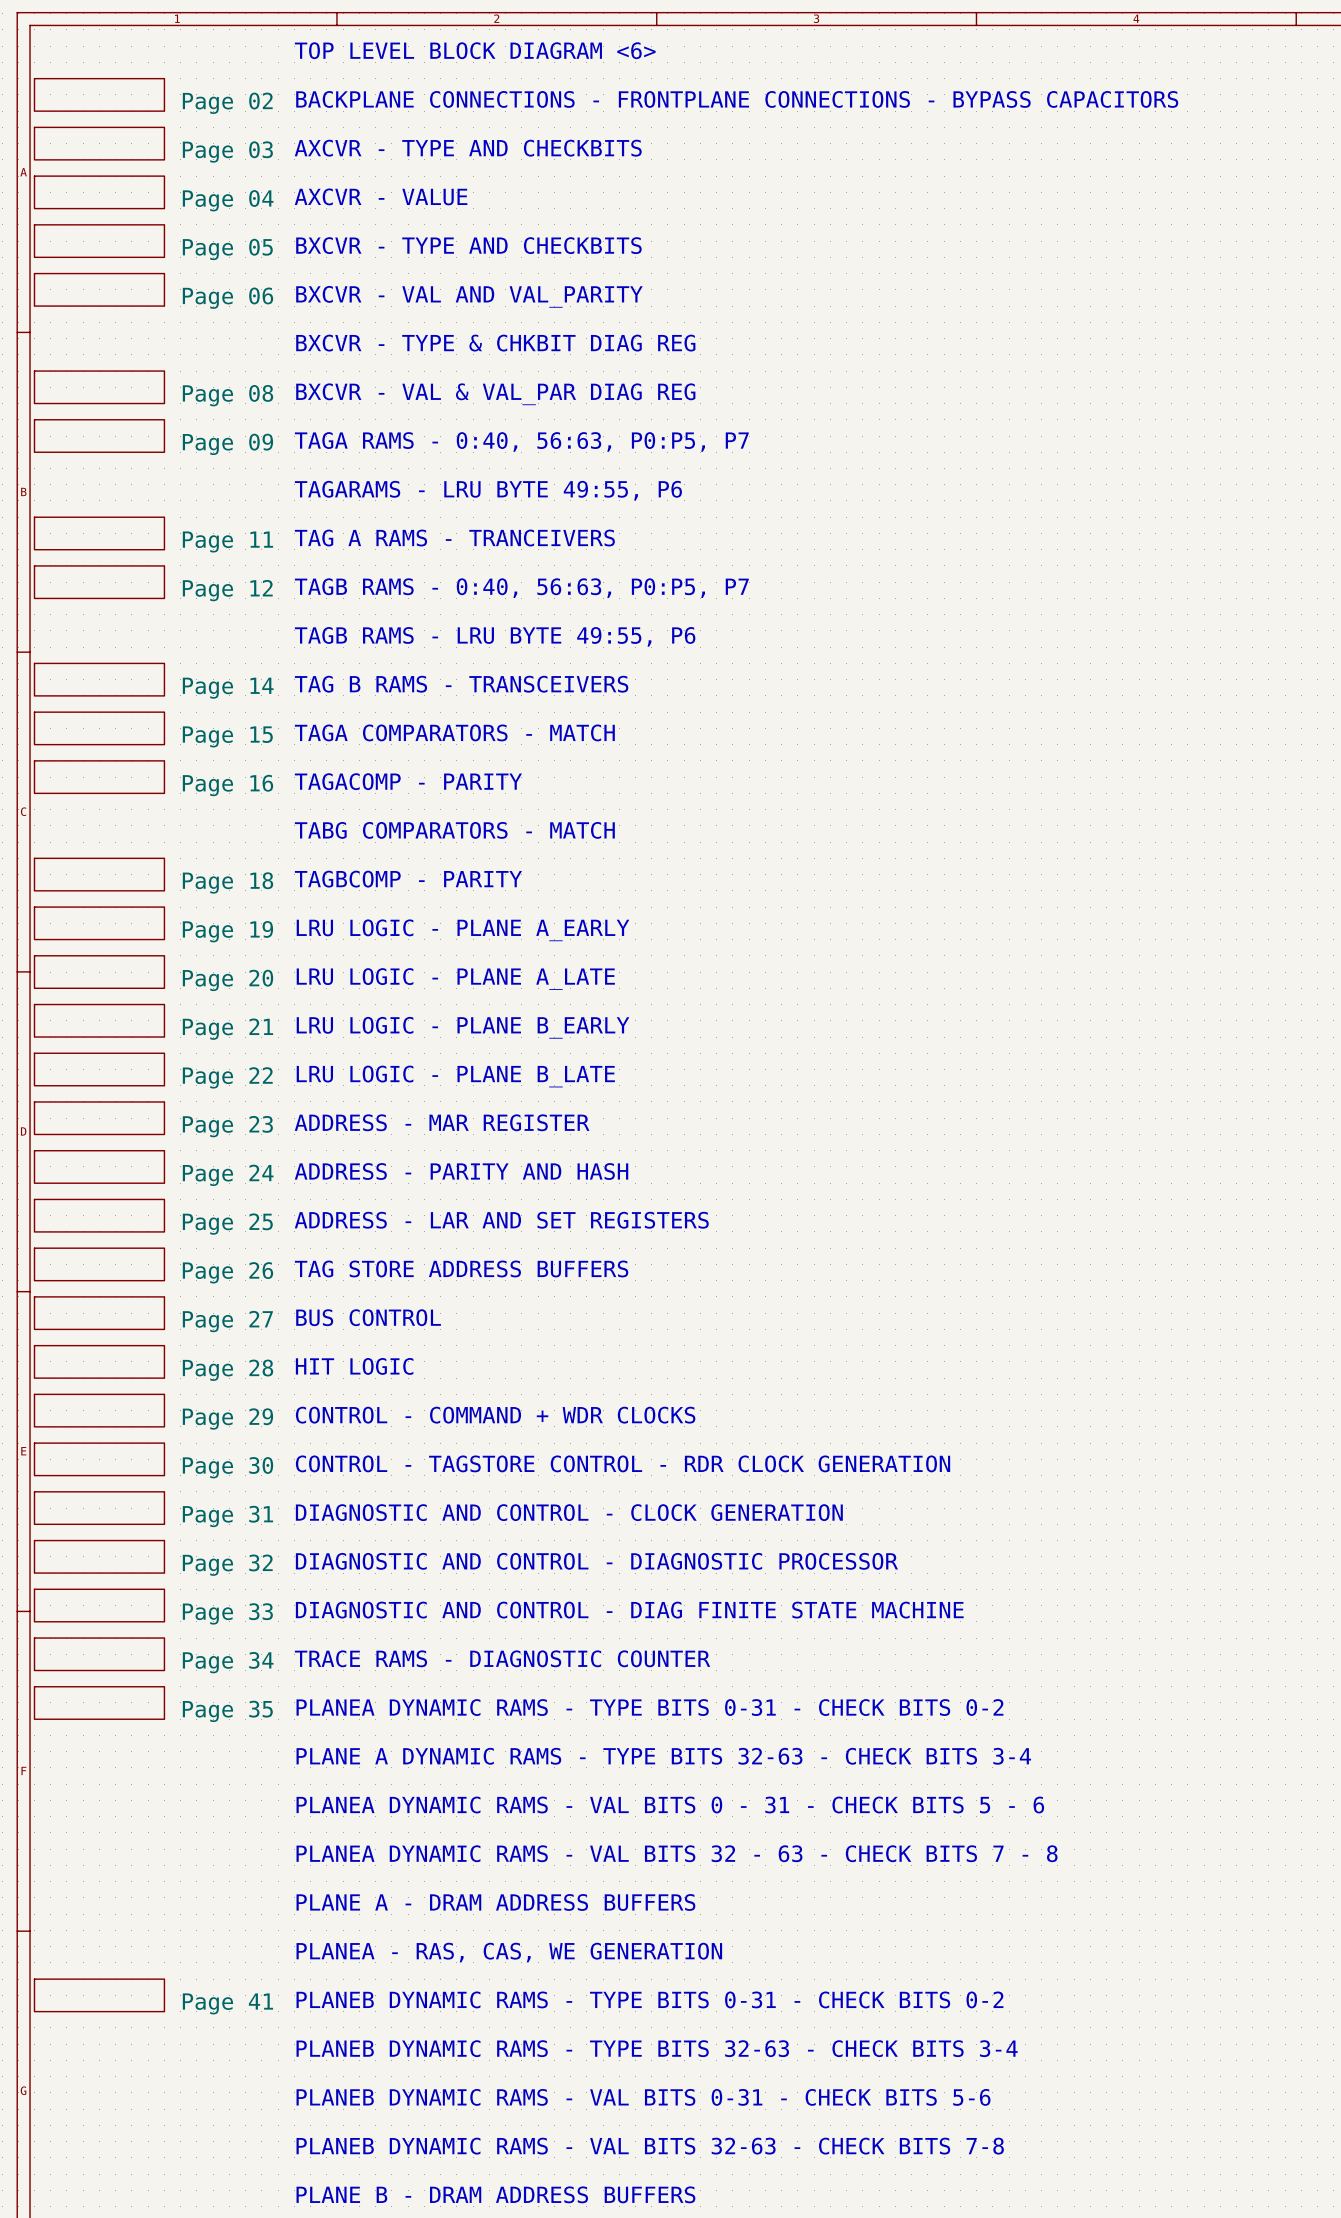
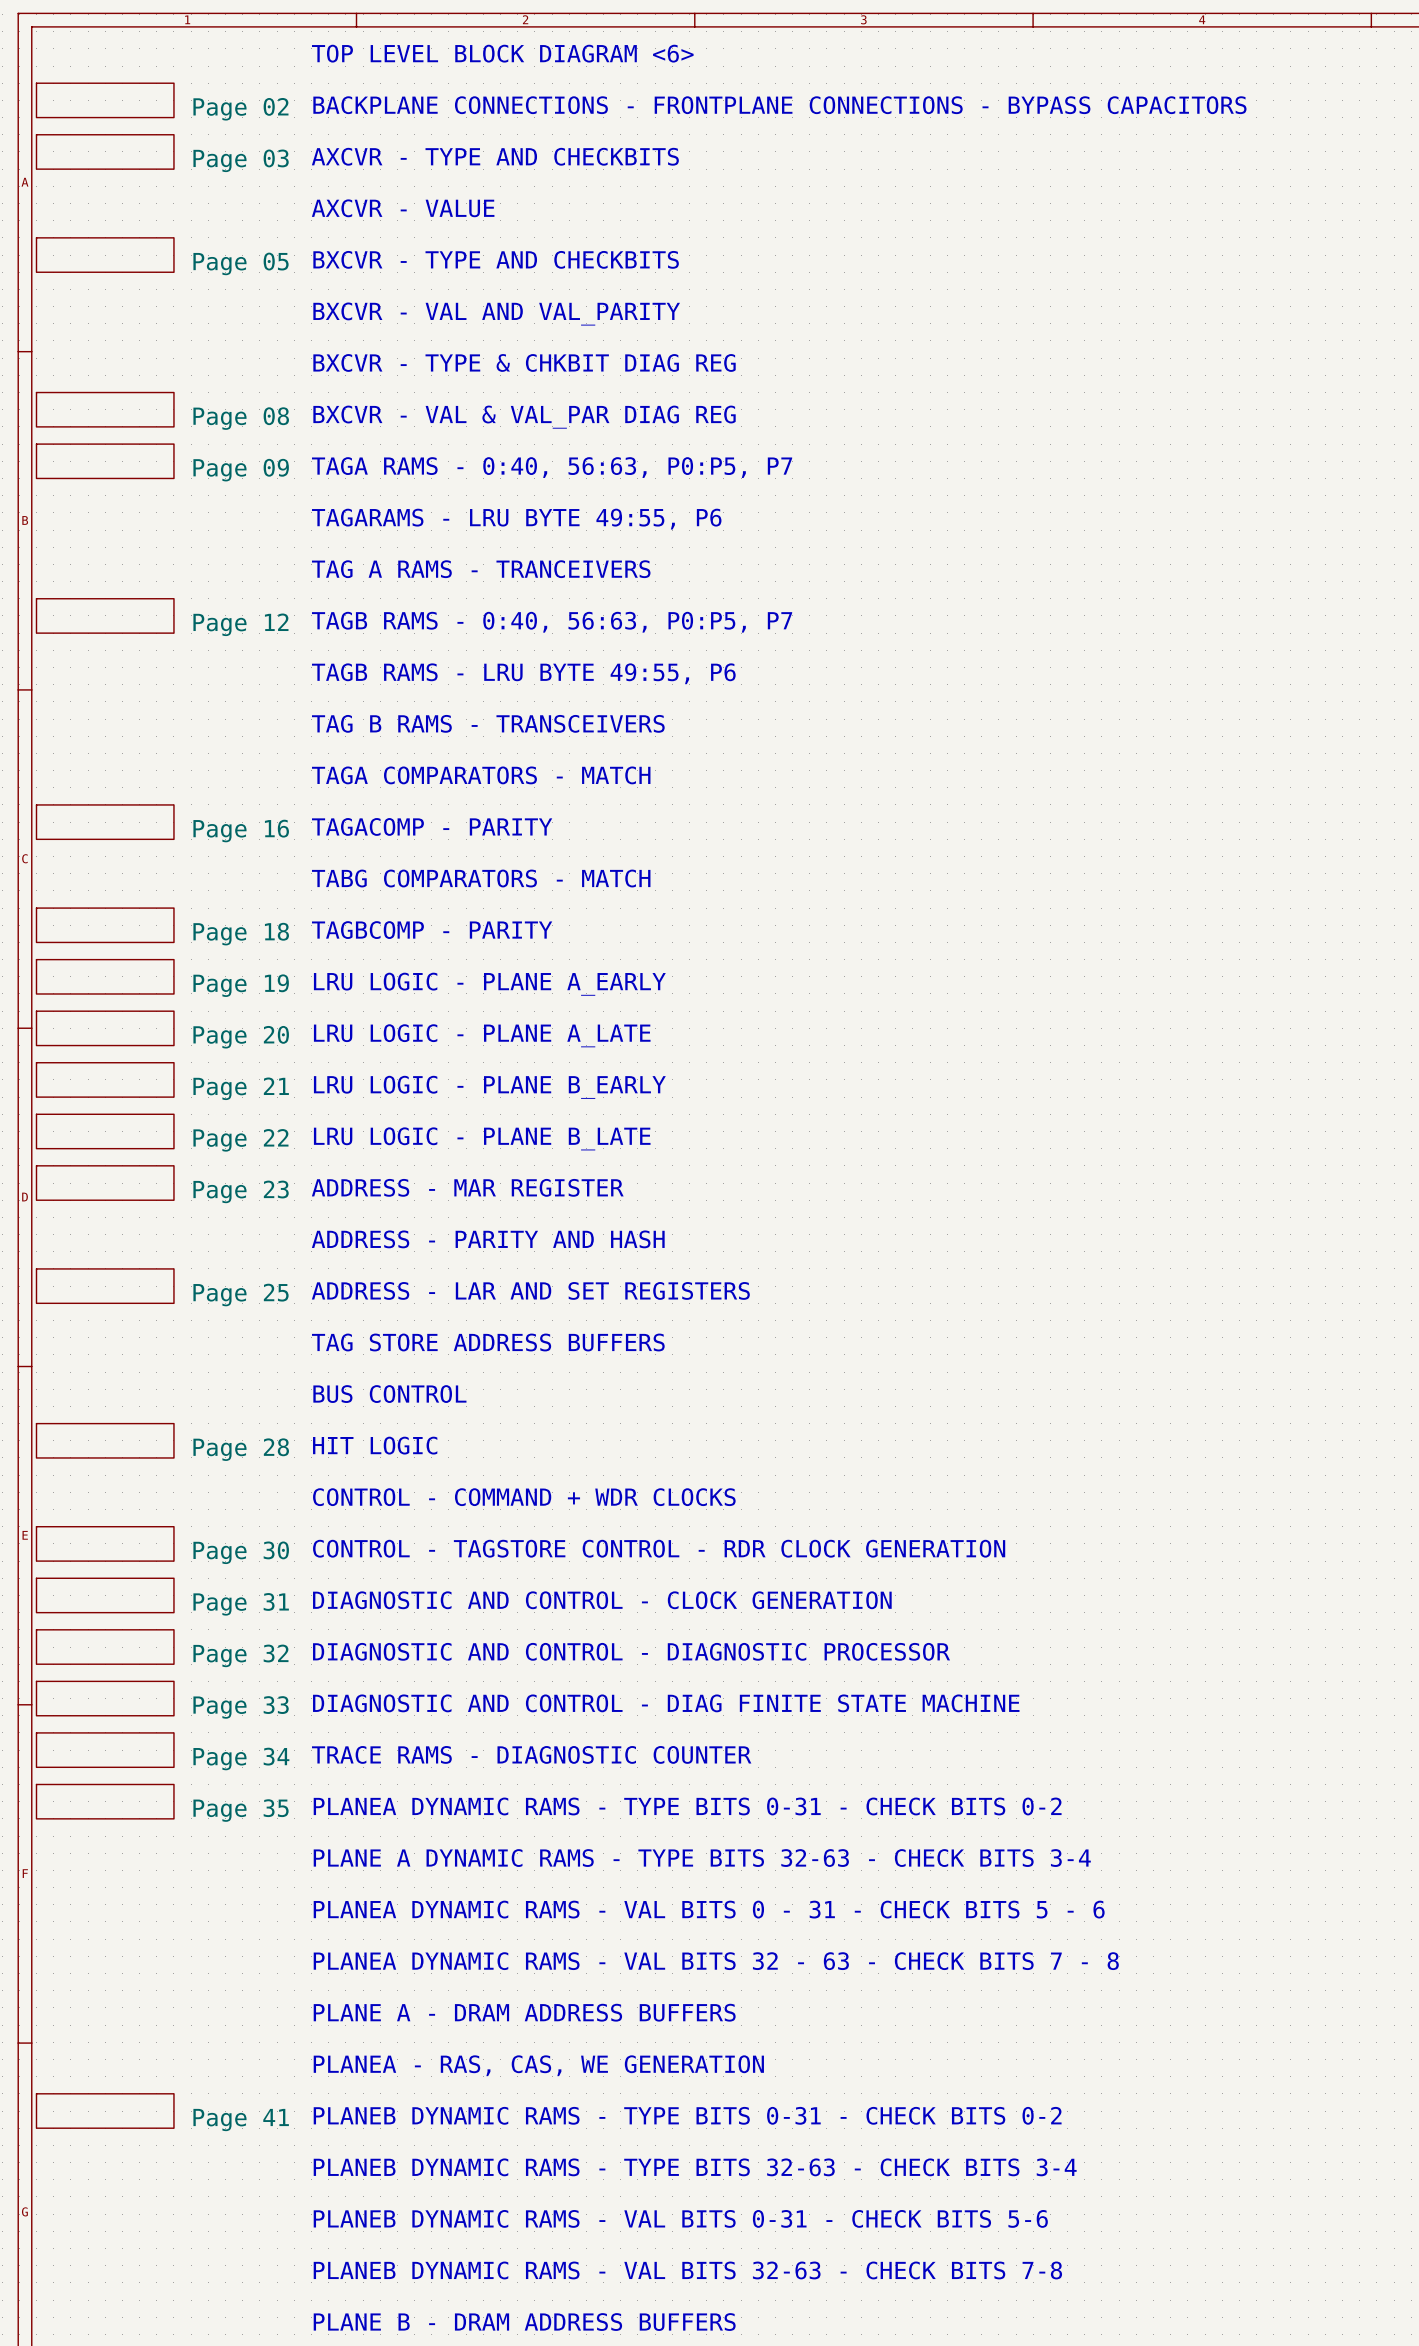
sheet Page 04: (99, 192) -> none
sheet Page 06: (99, 289) -> none
sheet Page 11: (99, 533) -> none
sheet Page 14: (99, 679) -> none
sheet Page 15: (99, 728) -> none
sheet Page 24: (99, 1166) -> none
sheet Page 26: (99, 1264) -> none
sheet Page 27: (99, 1313) -> none
sheet Page 29: (99, 1410) -> none

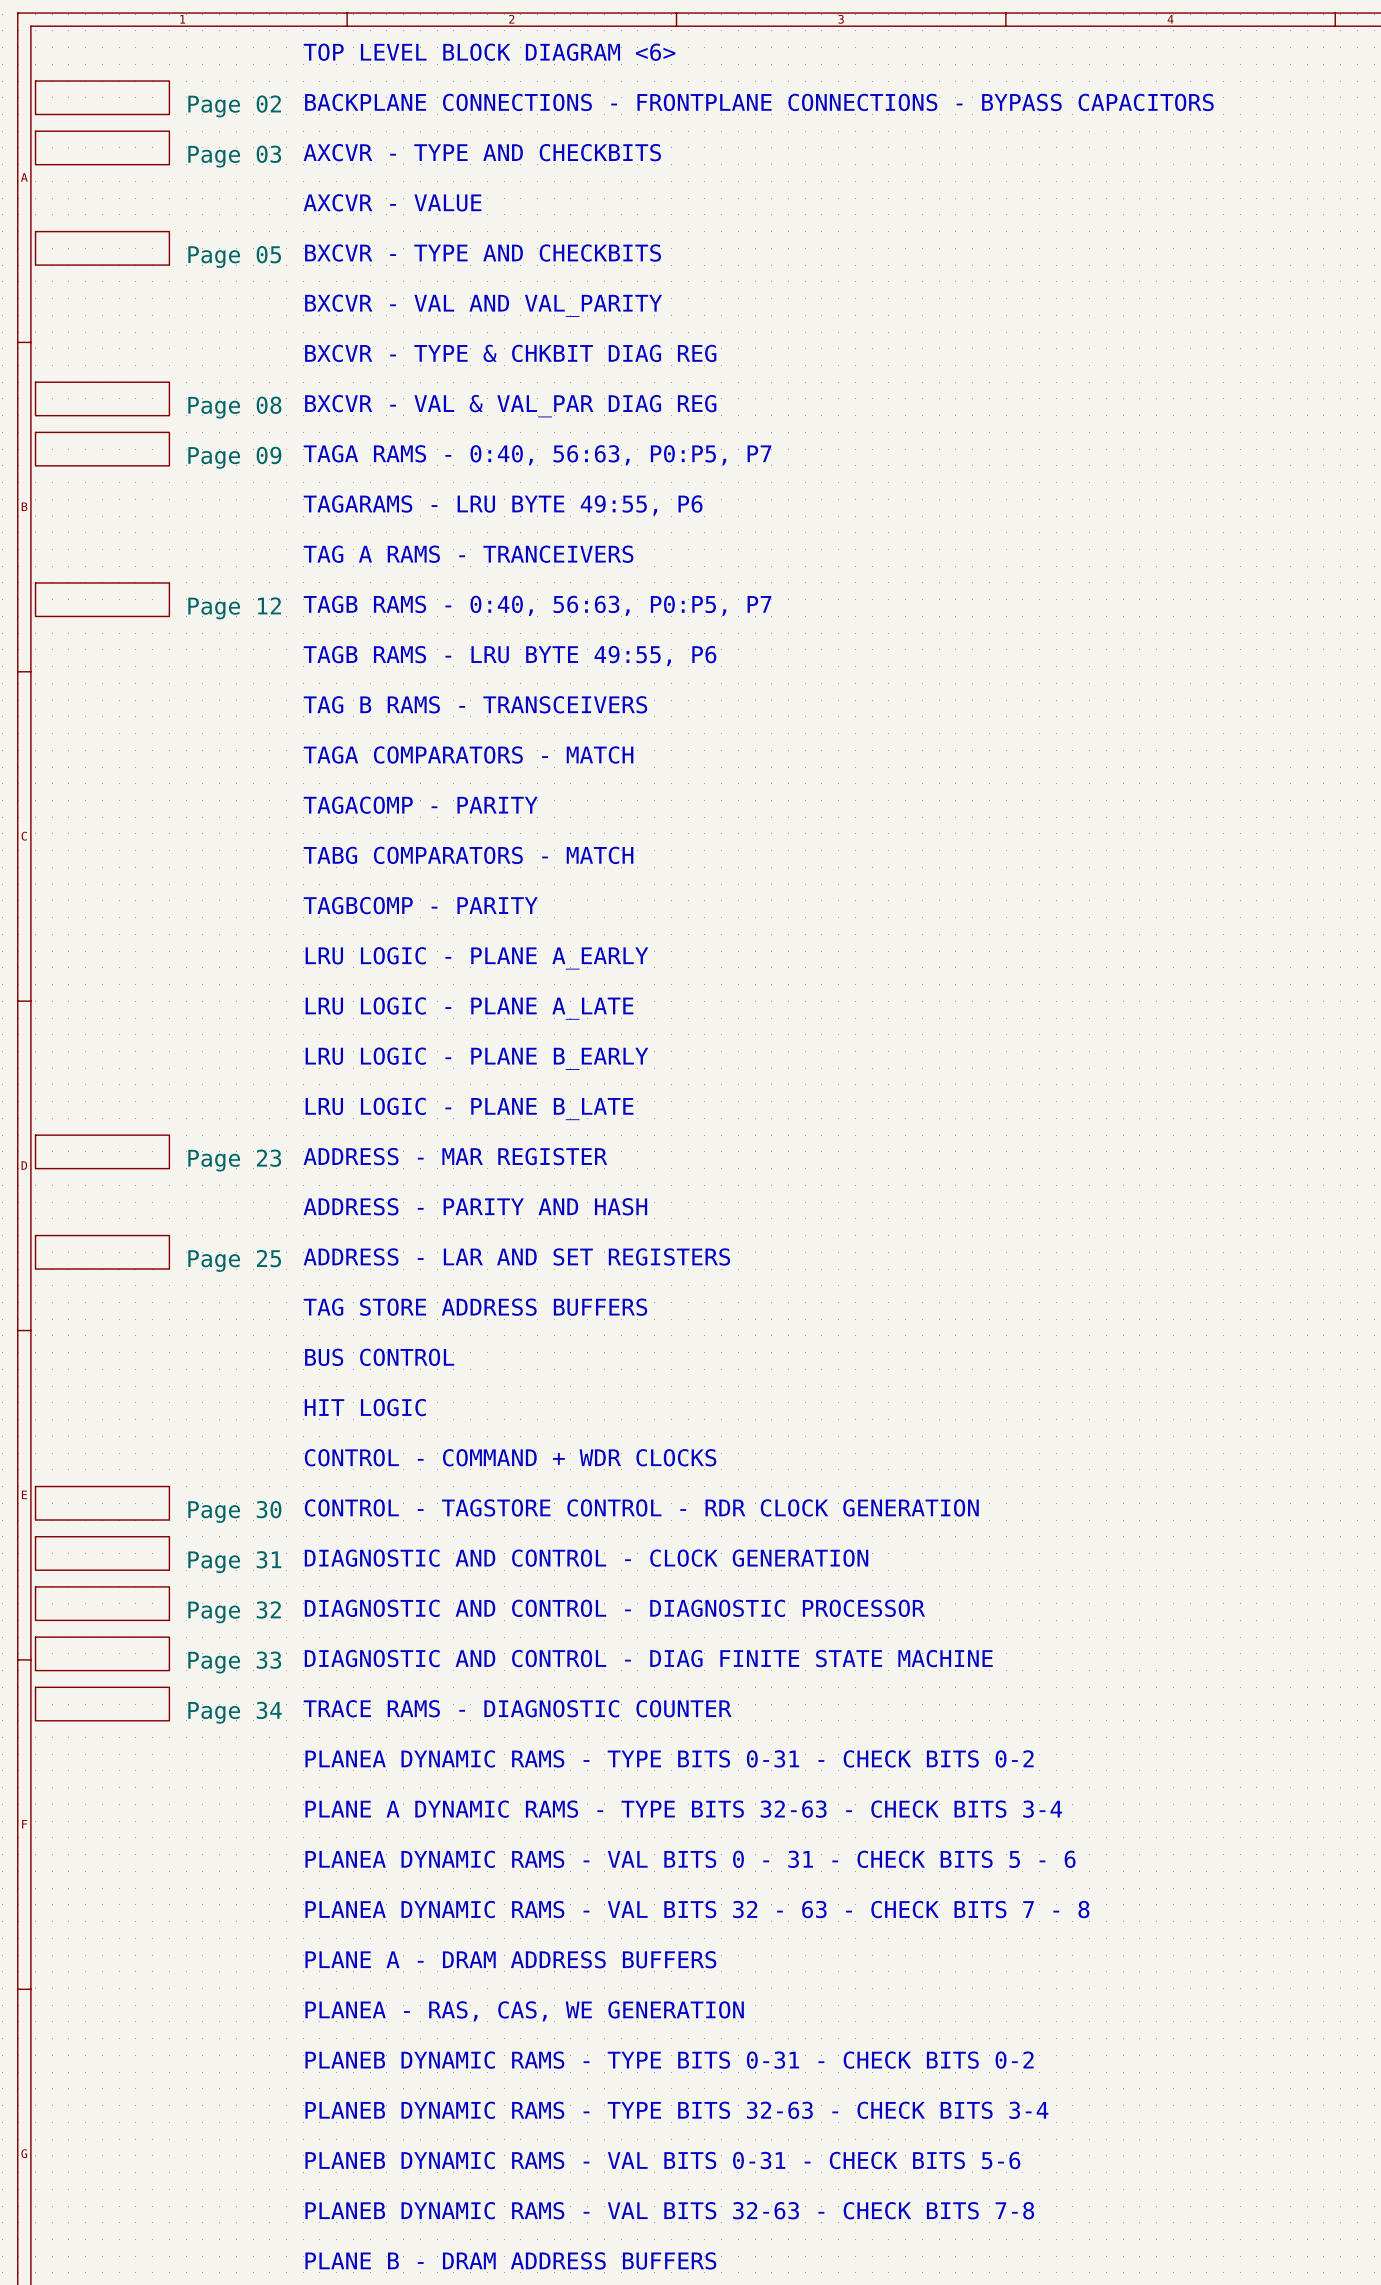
sheet Page 16: (105, 822) -> none
sheet Page 18: (105, 925) -> none
sheet Page 19: (105, 976) -> none
sheet Page 20: (105, 1028) -> none
sheet Page 21: (105, 1079) -> none
sheet Page 22: (105, 1131) -> none
sheet Page 28: (105, 1440) -> none
sheet Page 35: (105, 1801) -> none
sheet Page 41: (105, 2111) -> none

